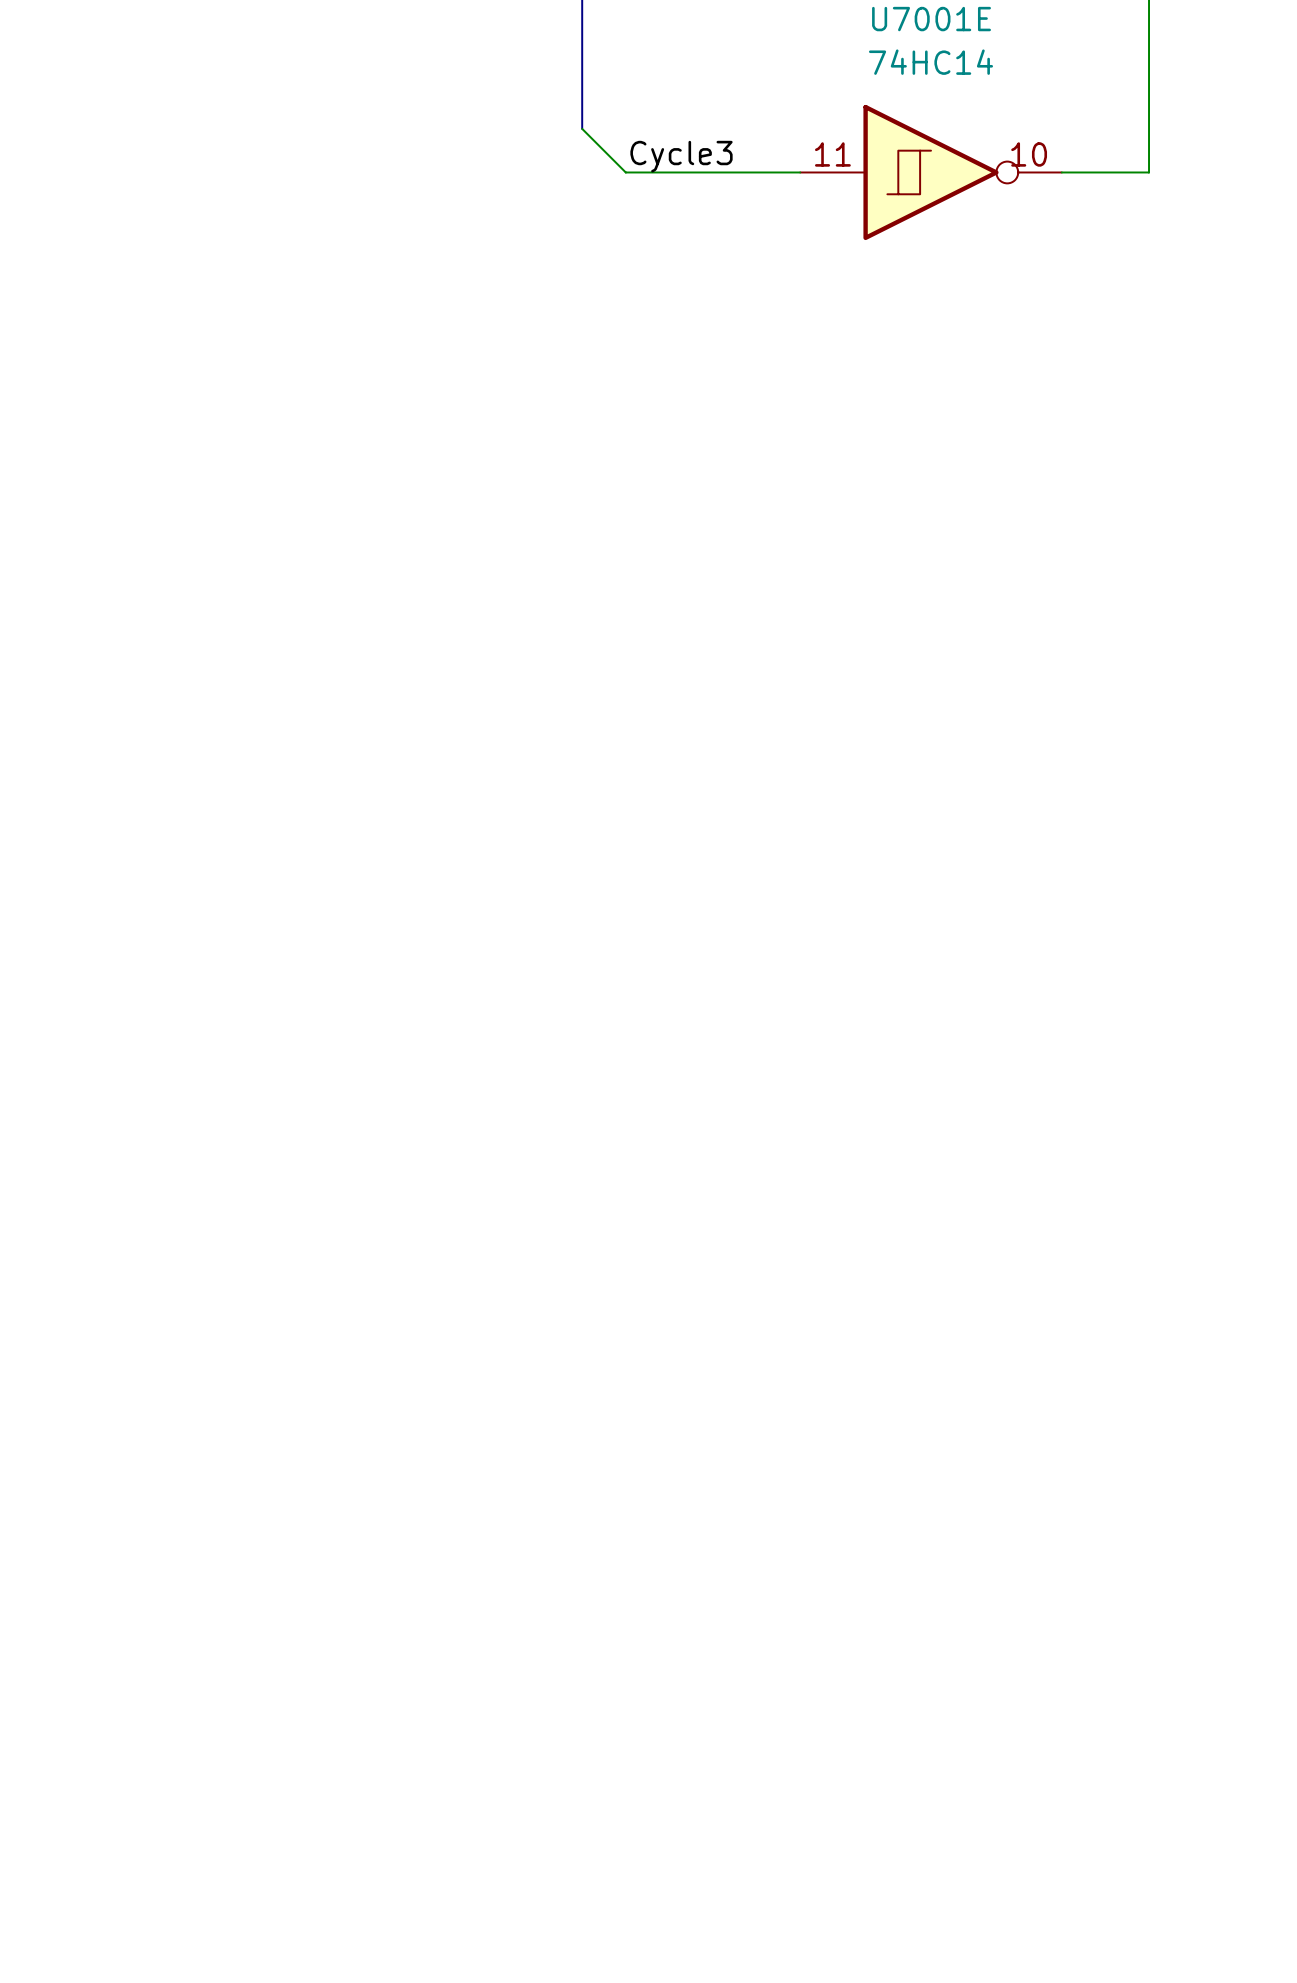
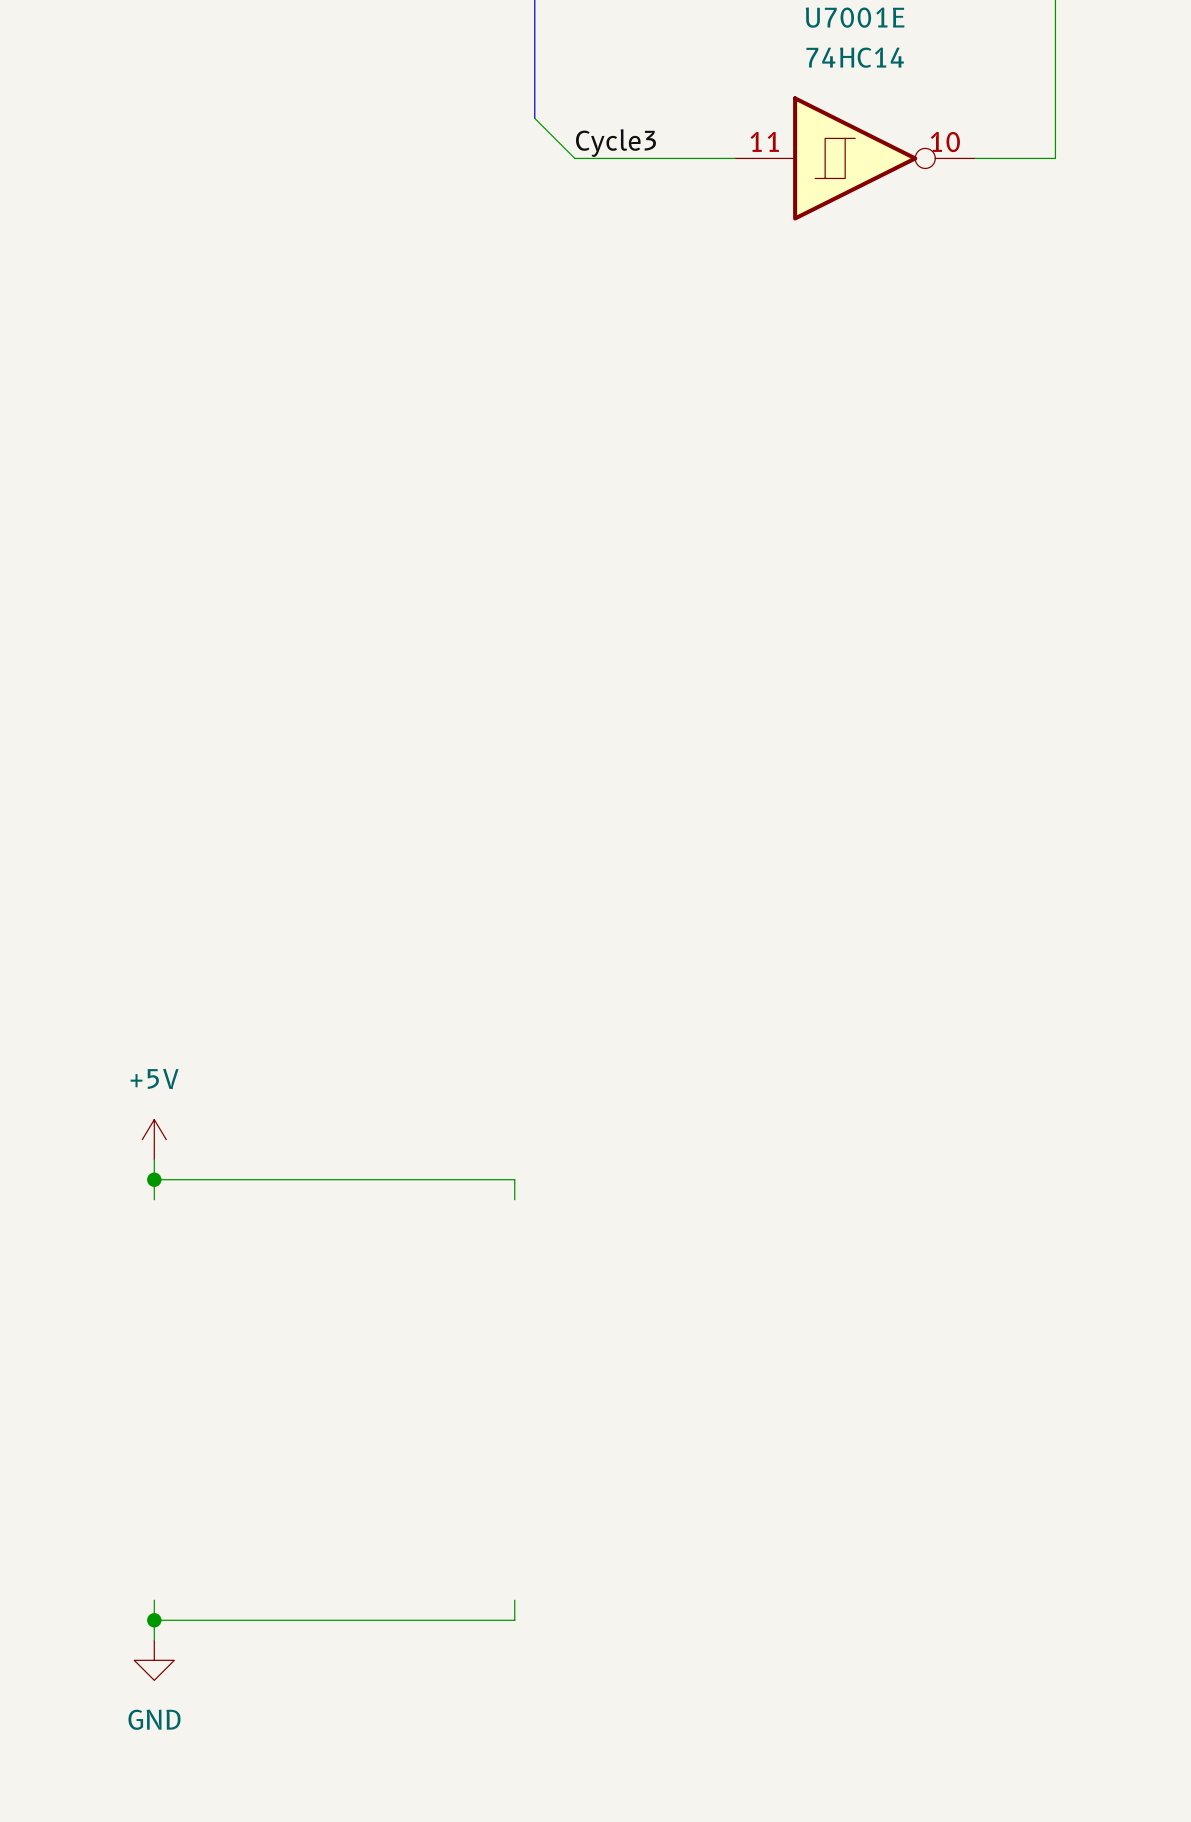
power symbol: none -> +5V (154, 1139)
wire: none -> (154, 1159) (154, 1199)
wire: none -> (154, 1179) (514, 1179) (514, 1199)
junction: none -> (154, 1179)
wire: none -> (154, 1600) (154, 1640)
wire: none -> (514, 1600) (514, 1620) (154, 1620)
junction: none -> (154, 1620)
power symbol: none -> GND (154, 1660)

